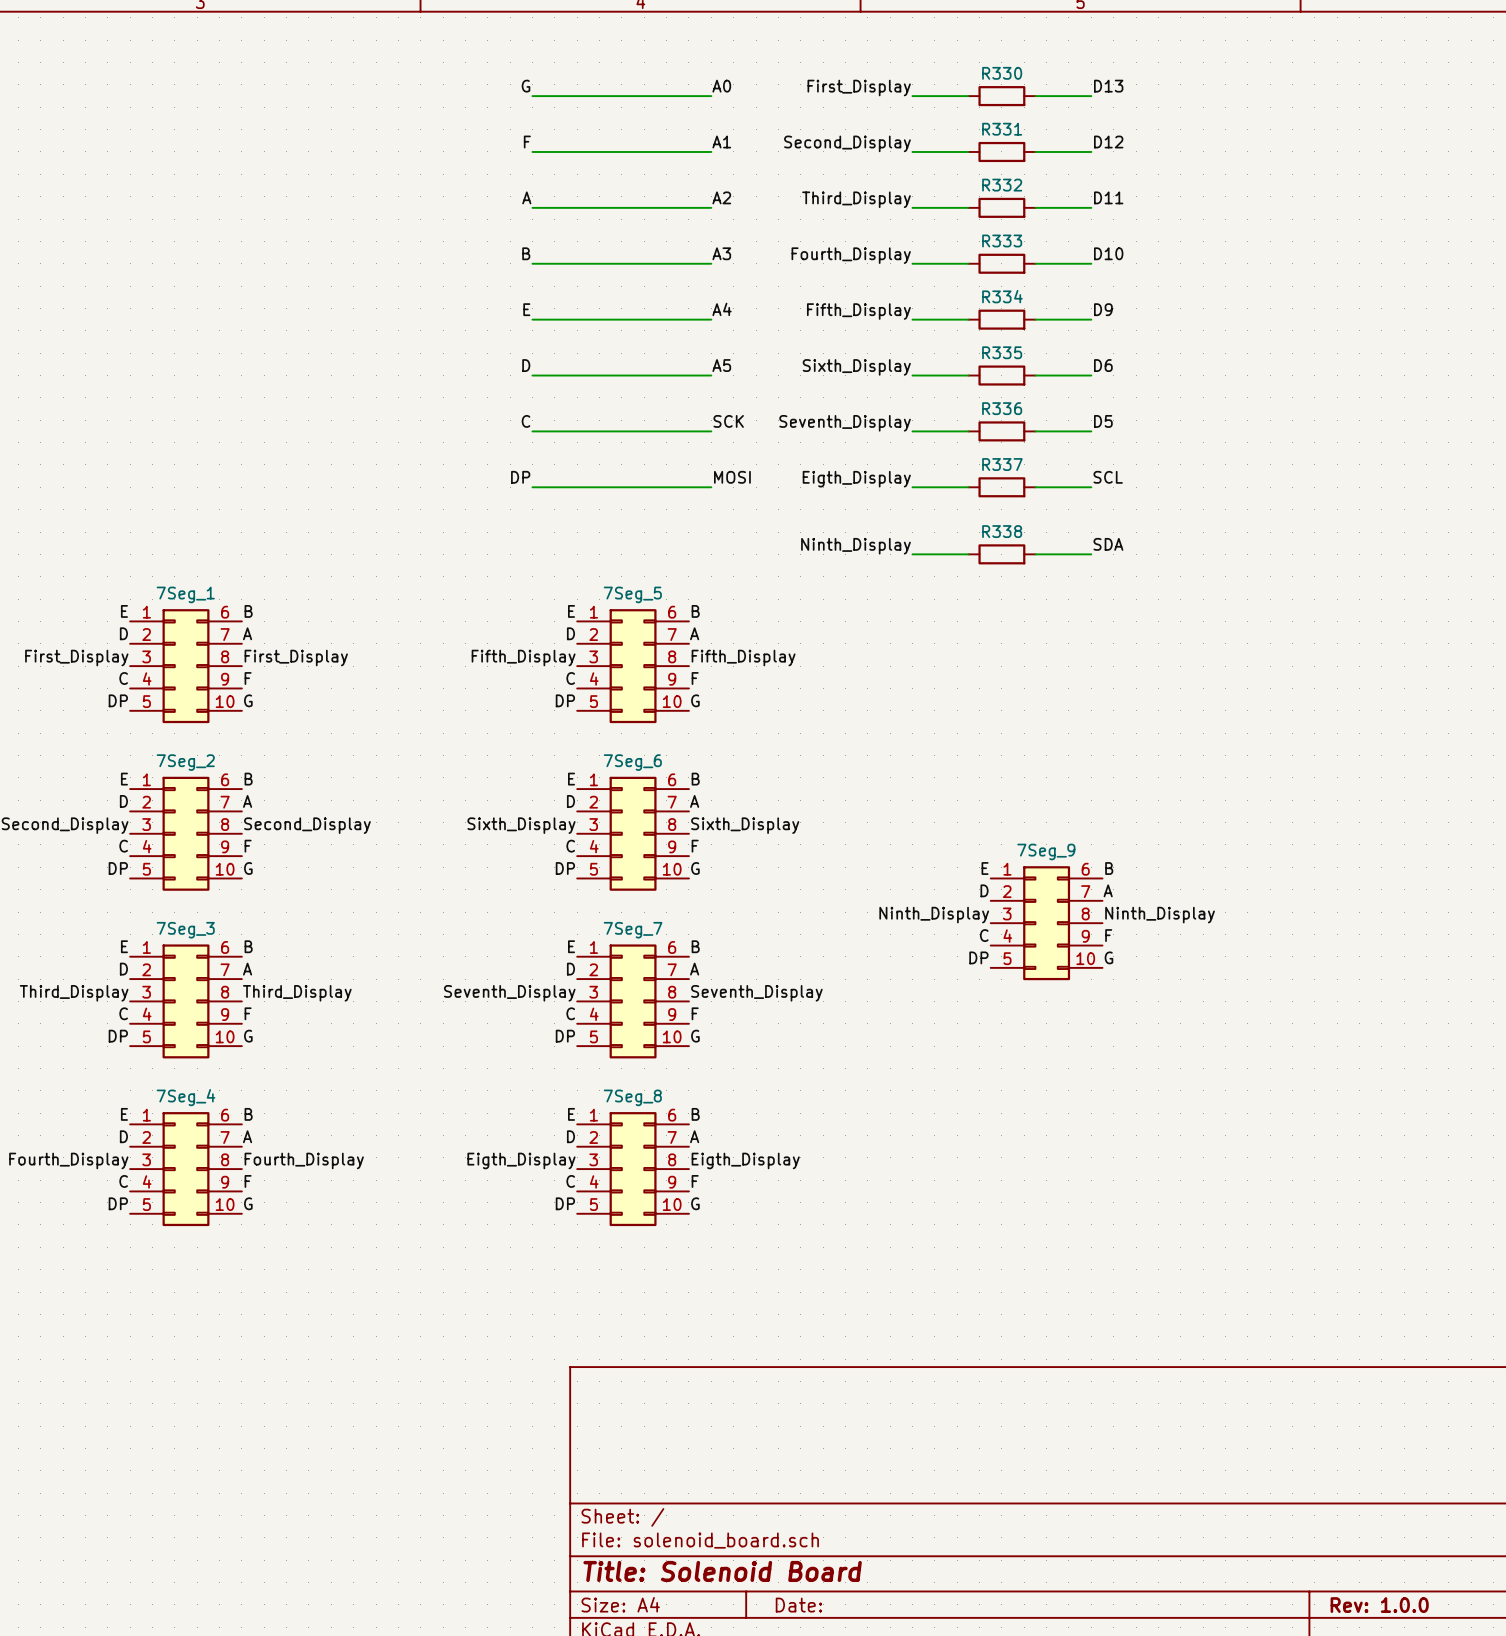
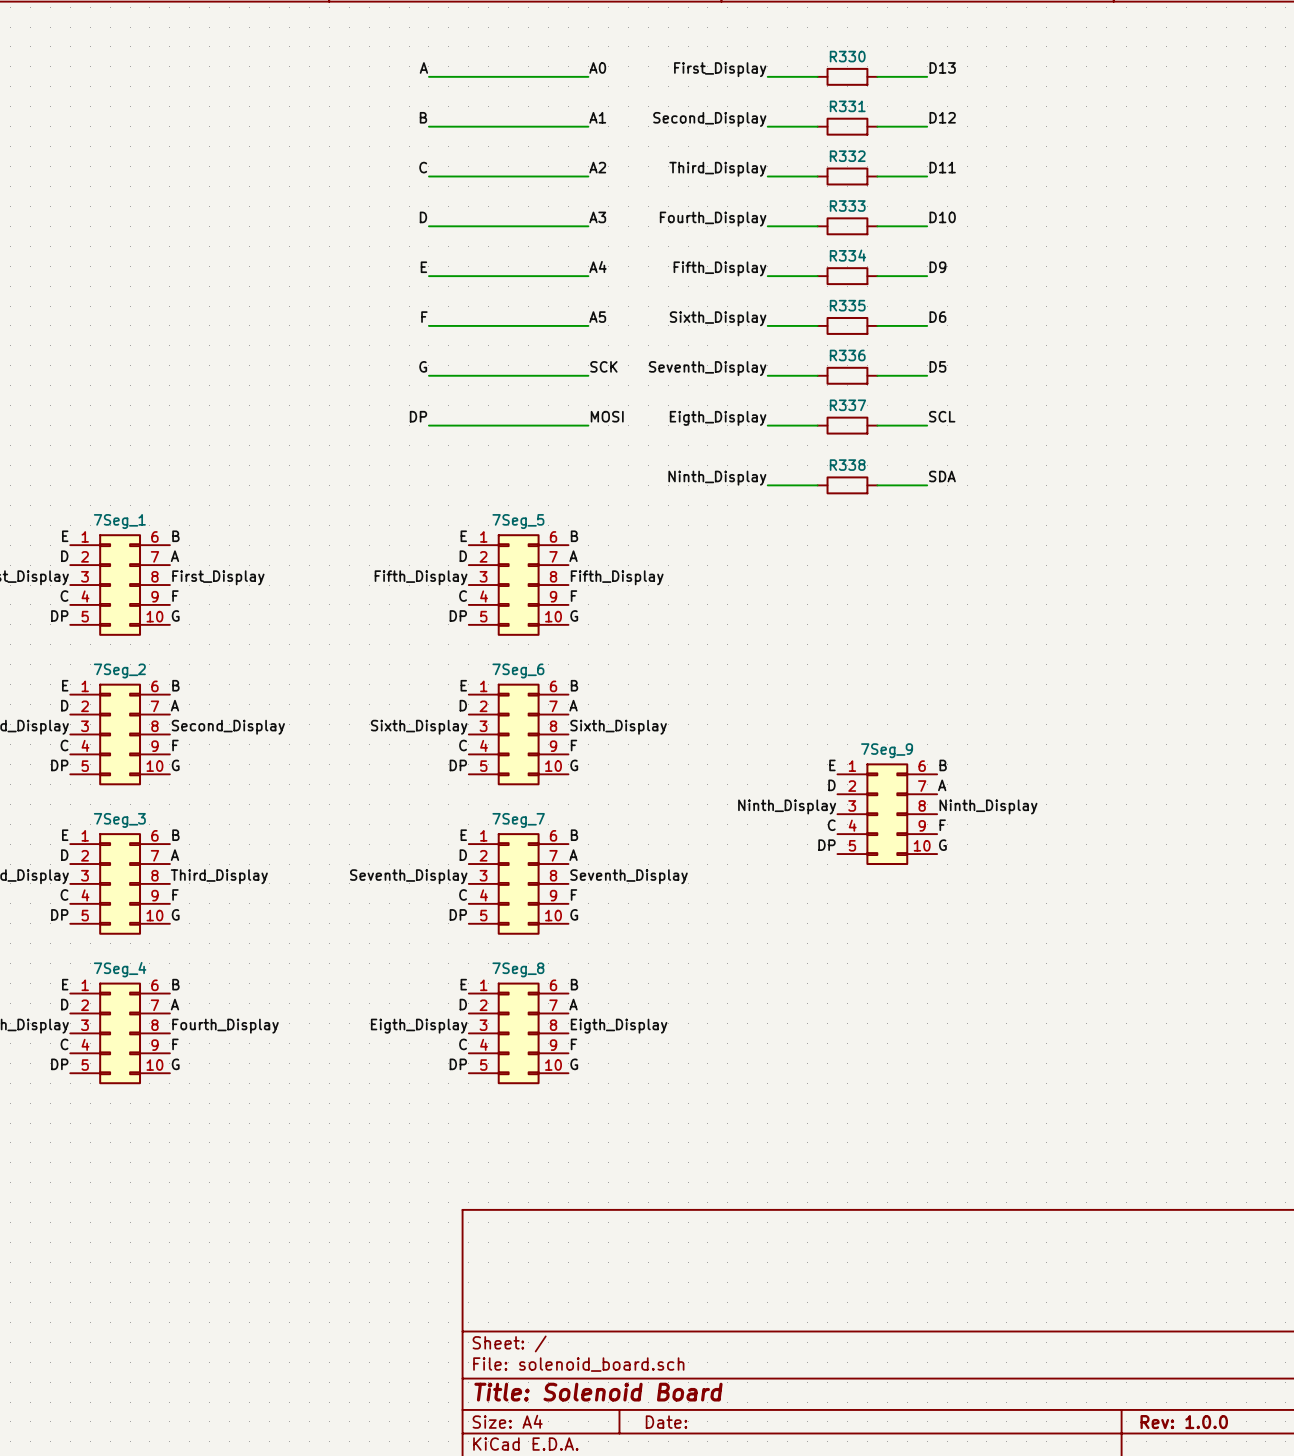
label: G (526, 86) -> A (423, 67)
label: F (527, 142) -> B (423, 117)
label: A (526, 197) -> C (423, 167)
label: B (526, 253) -> D (423, 217)
label: D (526, 365) -> F (424, 317)
label: C (526, 421) -> G (423, 366)

